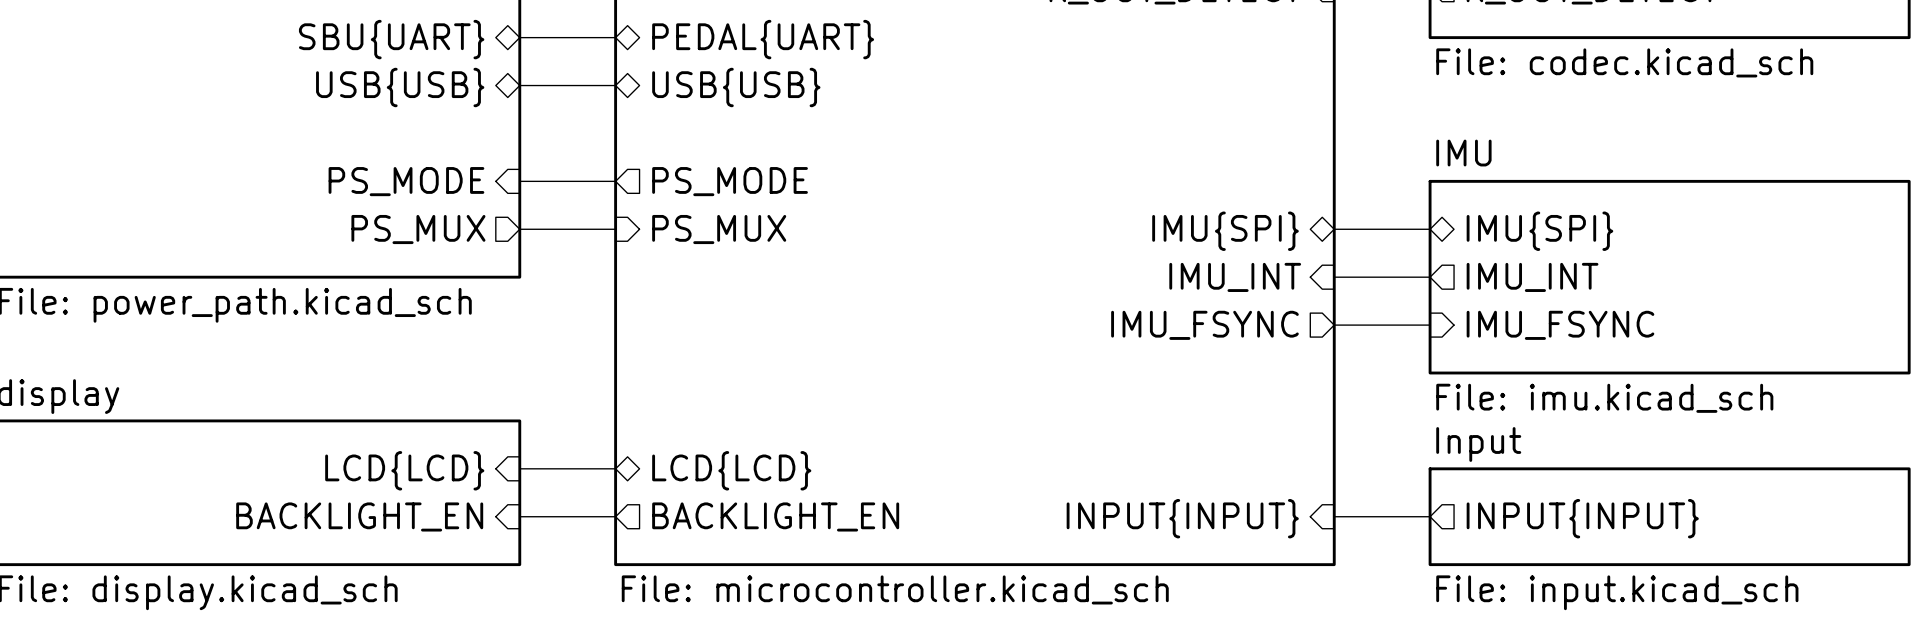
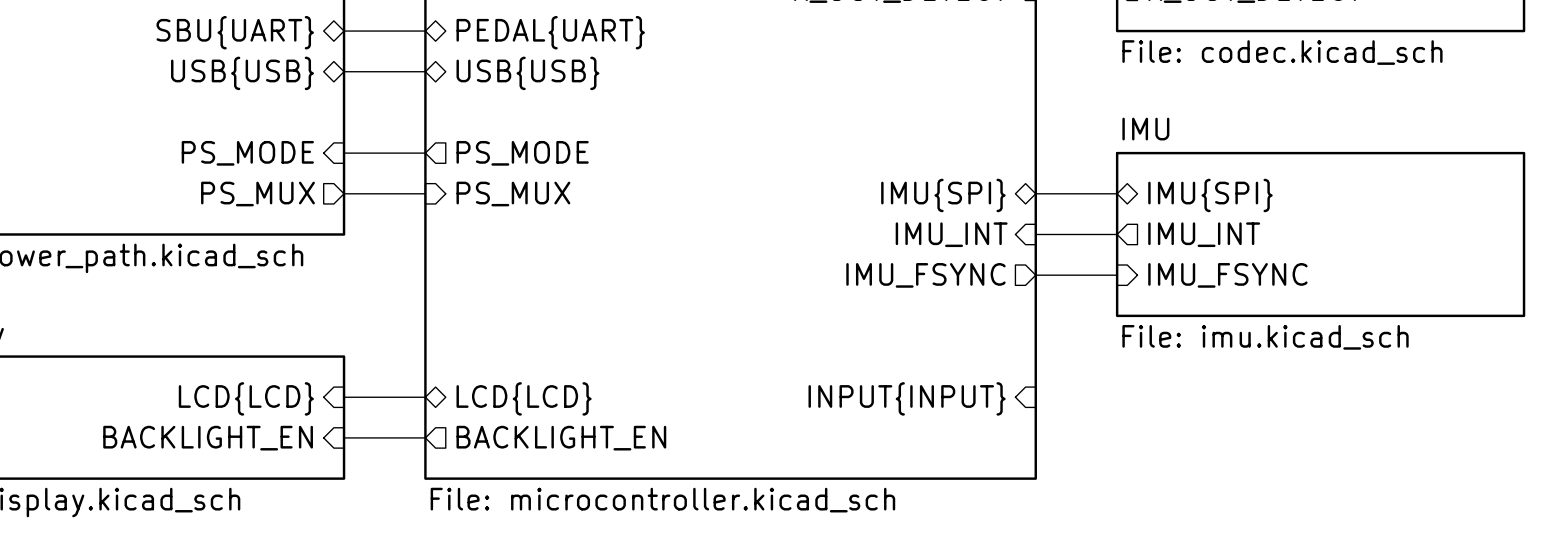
bus: (1334, 516) (1430, 516) -> none
sheet Input: File: input.kicad_sch (1669, 516) -> none
sheet pin position: INPUT{INPUT} (1182, 518) -> INPUT{INPUT} (907, 398)
sheet pin: INPUT{INPUT} (1582, 518) -> none

